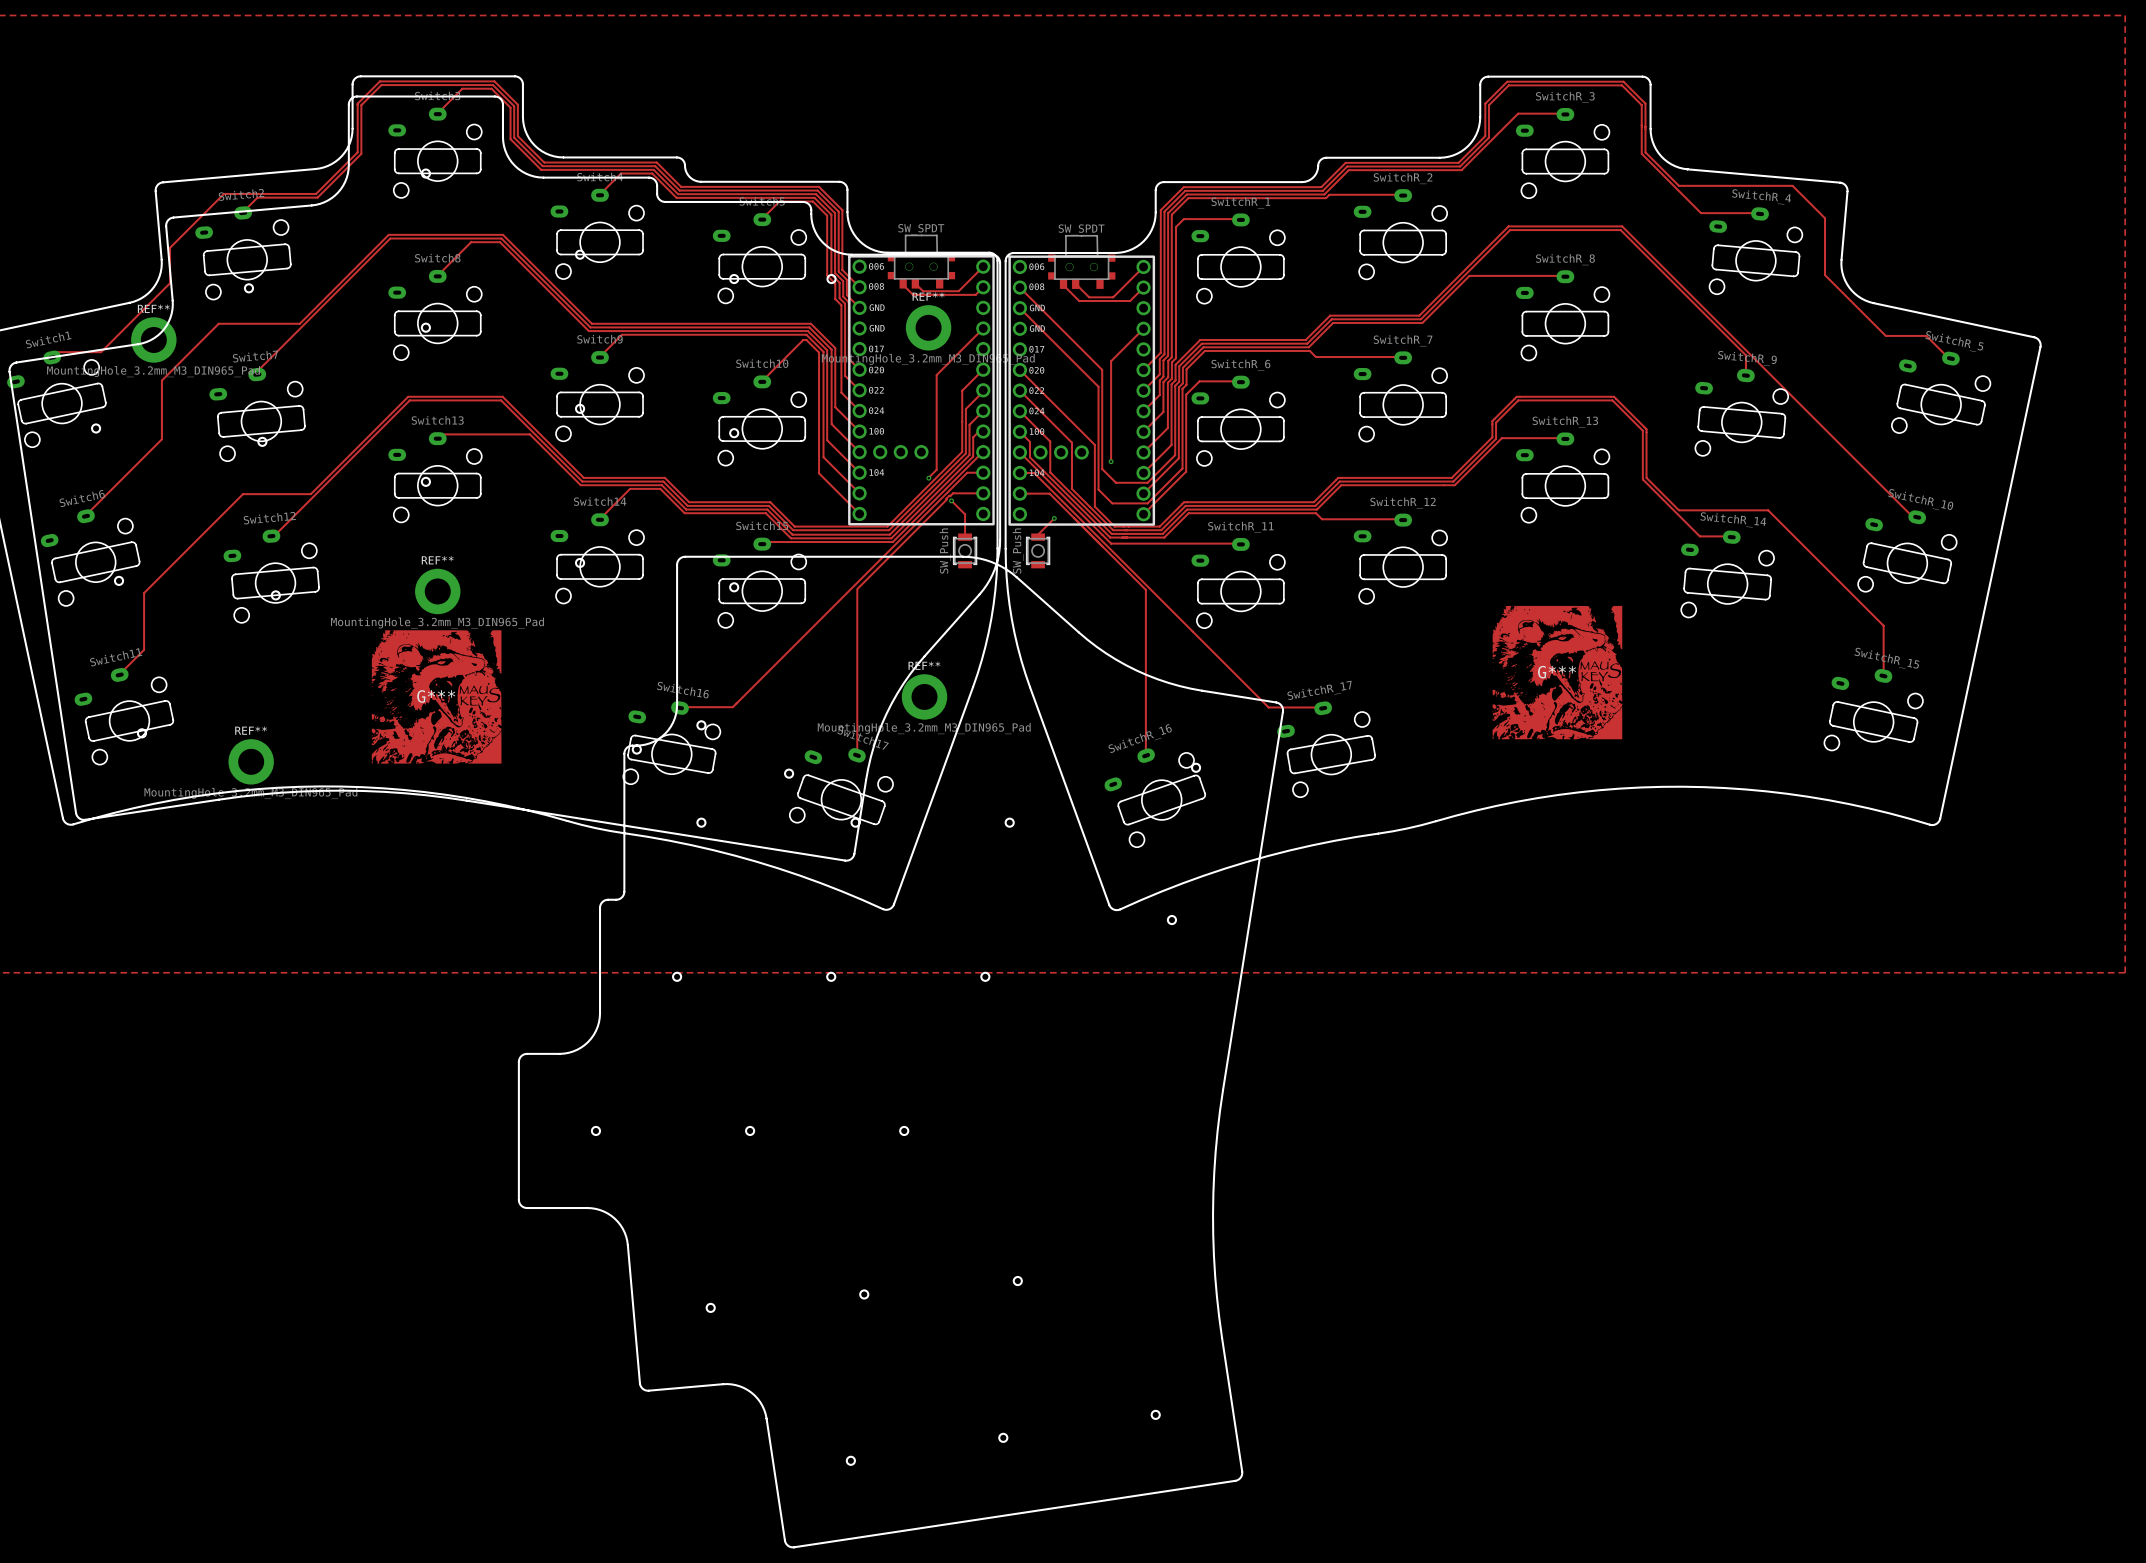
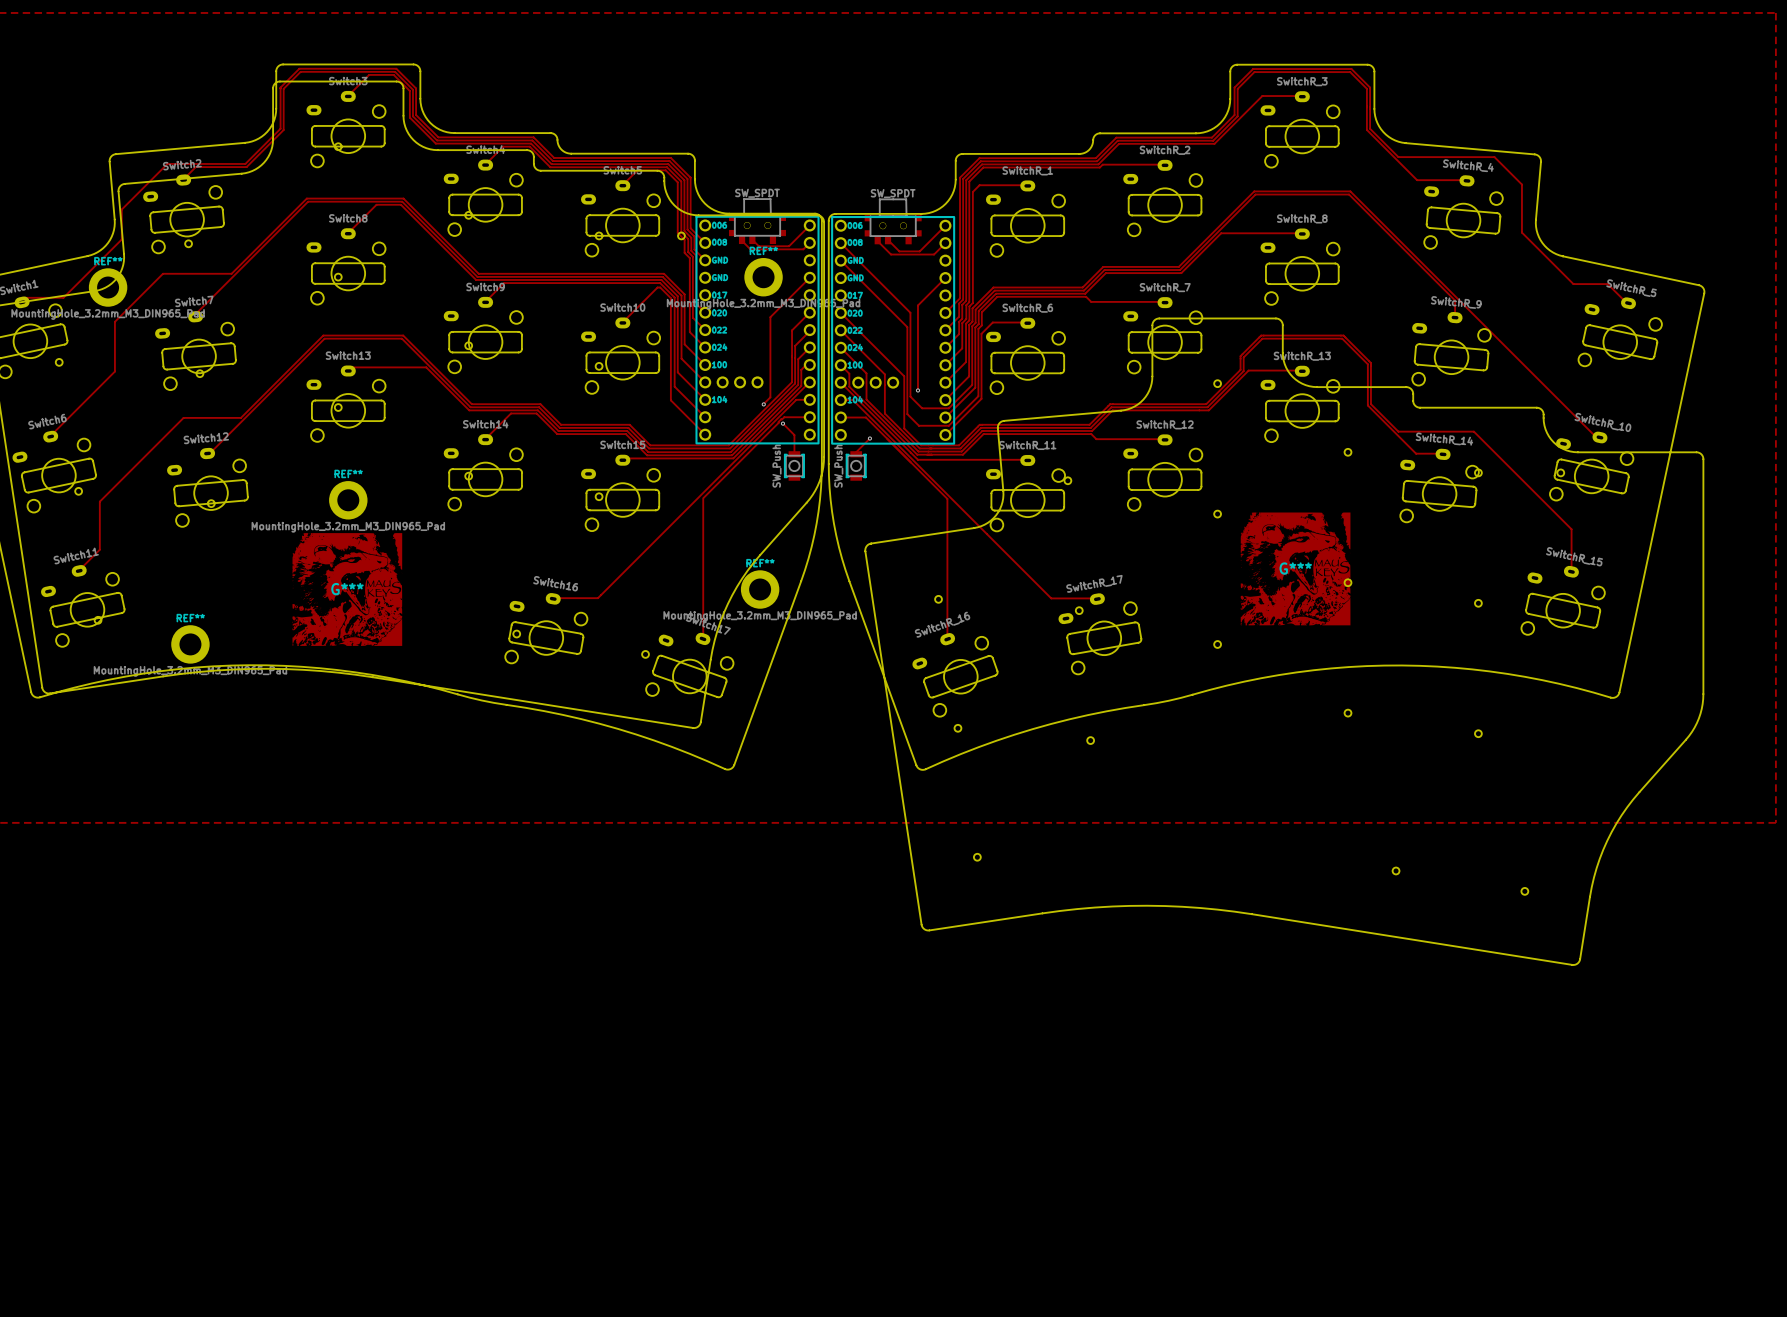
board edge: none -> (1159, 318) (1278, 318) (1282, 324) (1283, 356) (1286, 367) (1295, 379) (1309, 386) (1407, 387) (1412, 391) (1414, 404) (1419, 407) (1538, 407) (1543, 411) (1545, 429) (1551, 439) (1559, 447) (1570, 451) (1696, 452) (1702, 455) (1703, 694) (1701, 708) (1696, 723) (1689, 735) (1633, 799) (1607, 840) (1593, 877) (1580, 959) (1577, 963) (1572, 964) (1234, 911) (1182, 906) (1094, 907) (929, 930) (922, 927) (865, 547) (871, 543) (977, 527) (990, 520) (1000, 509) (1003, 498) (997, 428) (999, 423) (1004, 420) (1121, 410) (1137, 404) (1145, 396) (1151, 383) (1152, 324) (1155, 319) (1159, 318)
round board edge: none -> [1213, 379, 1222, 388]
round board edge: none -> [1343, 448, 1353, 457]
round board edge: none -> [1474, 468, 1483, 478]
round board edge: none -> [1556, 468, 1566, 478]
board edge: (685, 556) (962, 556) (980, 558) (997, 564) (1012, 573) (1087, 639) (1115, 659) (1136, 670) (1179, 686) (1276, 702) (1282, 706) (1282, 711) (1223, 1090) (1214, 1172) (1213, 1214) (1215, 1276) (1222, 1337) (1242, 1471) (1238, 1479) (789, 1546) (784, 1540) (765, 1414) (757, 1398) (747, 1390) (731, 1384) (648, 1390) (642, 1388) (639, 1383) (627, 1245) (620, 1225) (607, 1213) (595, 1208) (527, 1208) (519, 1203) (519, 1059) (525, 1053) (563, 1053) (577, 1049) (591, 1038) (597, 1026) (600, 1013) (600, 906) (605, 900) (620, 898) (624, 892) (624, 752) (629, 746) (645, 744) (658, 739) (668, 730) (674, 718) (677, 705) (677, 564) (679, 559) (685, 556) -> none
round board edge: none -> [1063, 476, 1073, 486]
round board edge: none -> [1213, 509, 1222, 519]
round board edge: none -> [1343, 578, 1353, 588]
round board edge: none -> [934, 595, 943, 604]
round board edge: none -> [1474, 599, 1483, 608]
round board edge: none -> [1074, 606, 1084, 615]
round board edge: [696, 720, 707, 731] -> none
round board edge: none -> [1213, 640, 1222, 649]
round board edge: [1190, 762, 1202, 773] -> none
round board edge: [696, 817, 707, 828] -> none
round board edge: [850, 817, 861, 828] -> none
round board edge: [1004, 817, 1015, 828] -> none
round board edge: none -> [1343, 708, 1353, 718]
round board edge: none -> [953, 724, 963, 733]
round board edge: none -> [1474, 729, 1483, 739]
round board edge: none -> [1086, 736, 1095, 745]
round board edge: [1166, 914, 1178, 926] -> none
round board edge: [672, 971, 683, 982] -> none
round board edge: [826, 971, 837, 982] -> none
round board edge: [980, 971, 991, 982] -> none
round board edge: none -> [973, 852, 982, 862]
round board edge: none -> [1391, 866, 1401, 876]
round board edge: none -> [1520, 887, 1530, 896]
round board edge: [590, 1125, 602, 1137] -> none
round board edge: [745, 1125, 756, 1137] -> none
round board edge: [899, 1125, 910, 1137] -> none
round board edge: [1012, 1275, 1023, 1287] -> none
round board edge: [859, 1289, 870, 1300] -> none
round board edge: [705, 1302, 716, 1313] -> none
round board edge: [1150, 1409, 1161, 1420] -> none
round board edge: [998, 1432, 1009, 1443] -> none
round board edge: [845, 1455, 856, 1466] -> none

